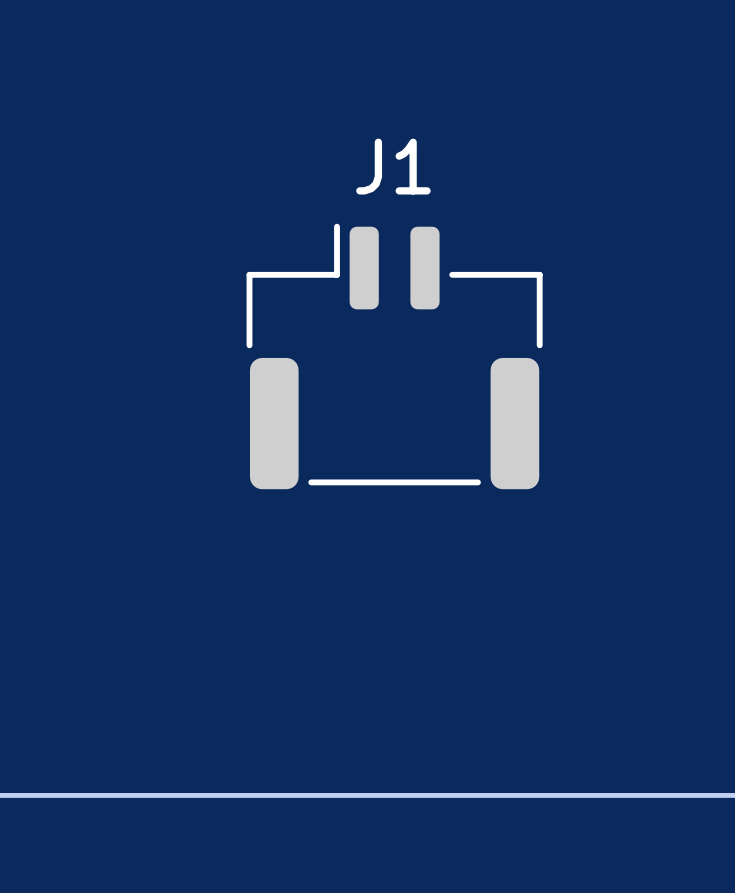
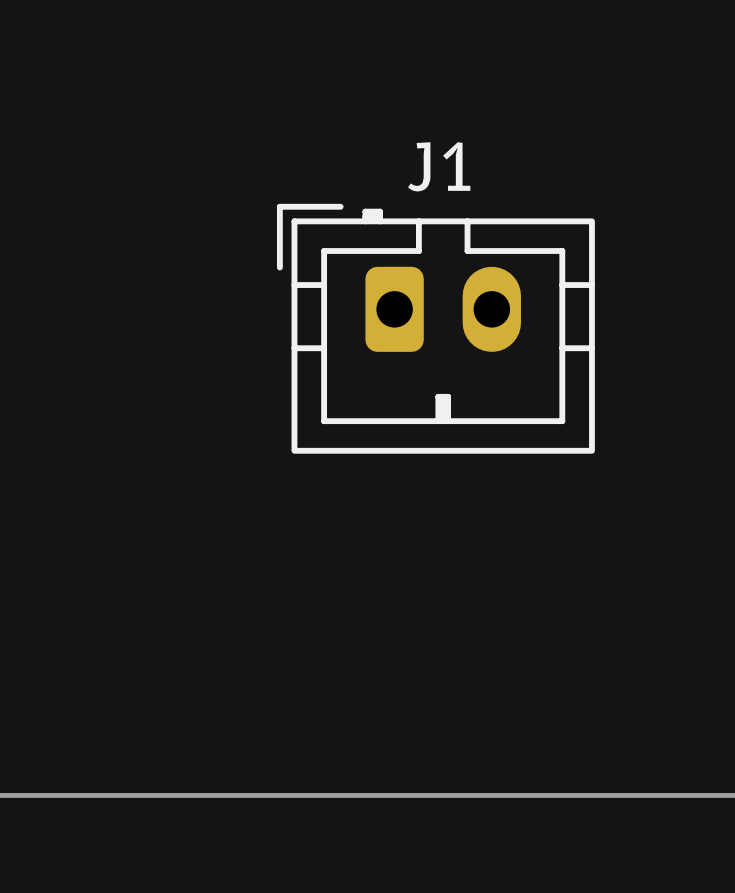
J1 footprint: [246, 223, 543, 490] -> [276, 203, 595, 454]

